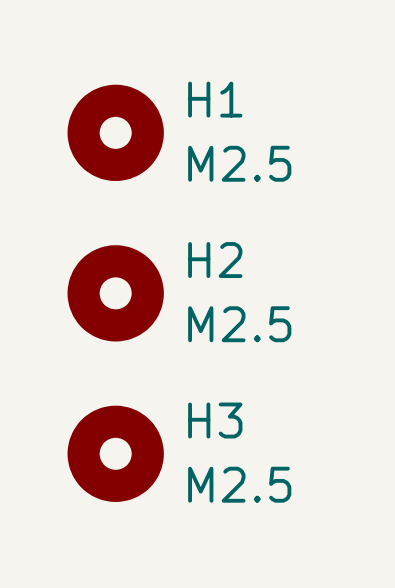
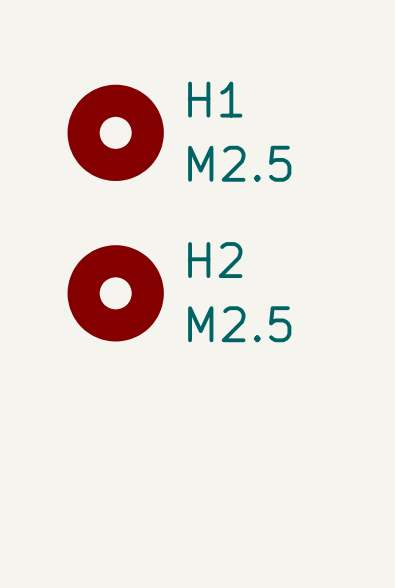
H3: M2.5 (115, 453) -> none

